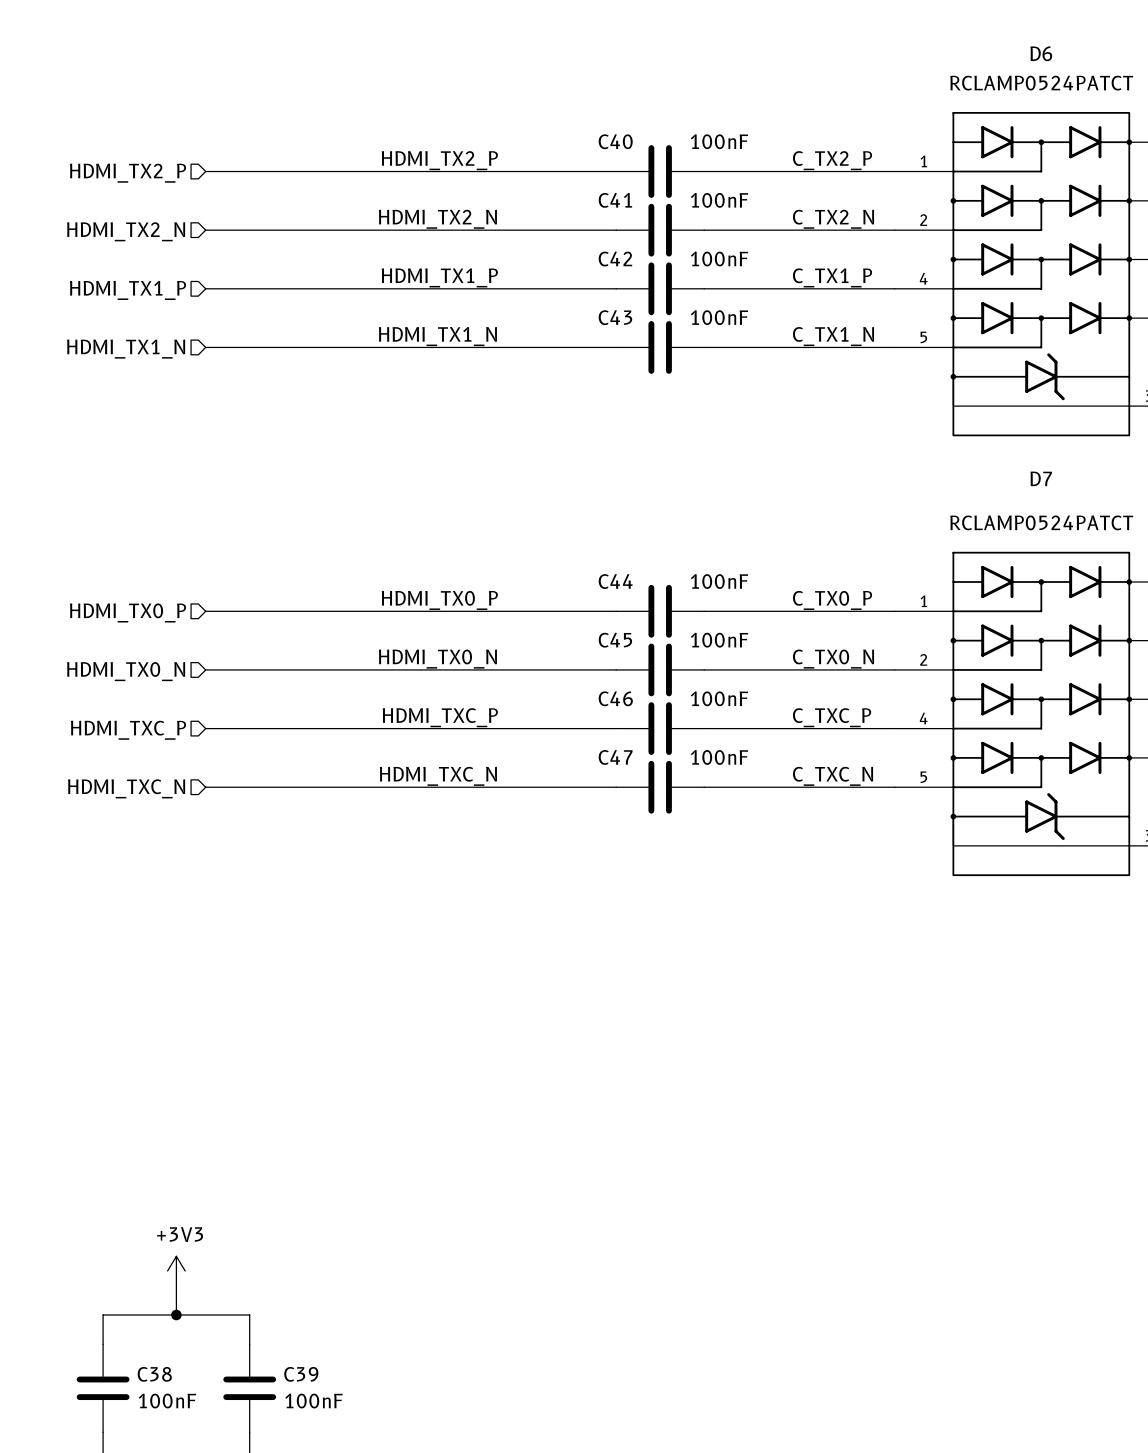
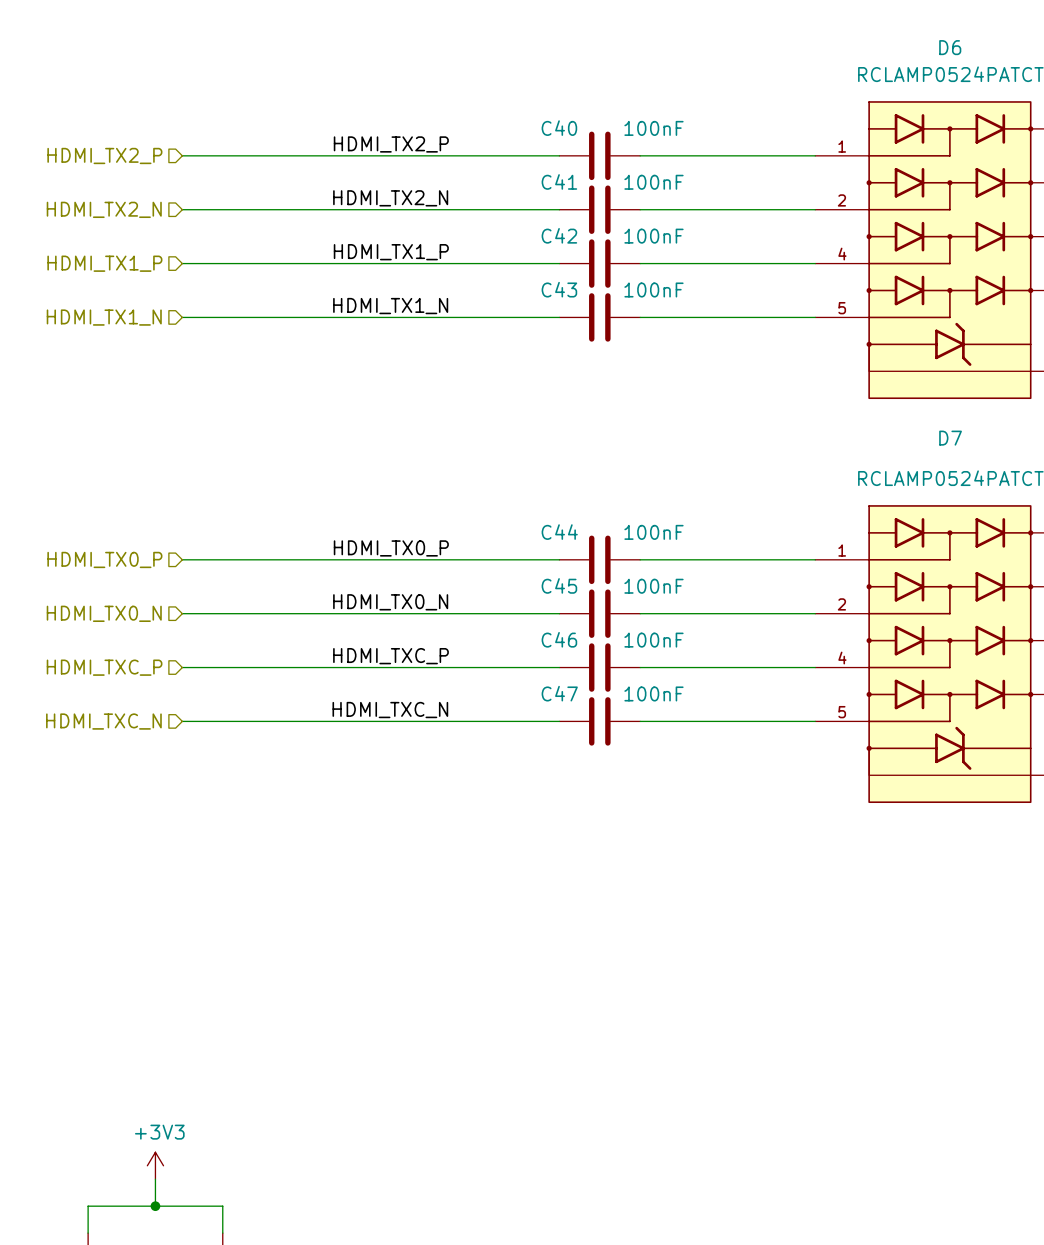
label: C_TX2_P (832, 160) -> none
label: C_TX2_N (833, 219) -> none
label: C_TX1_P (832, 277) -> none
label: C_TX1_N (833, 336) -> none
label: C_TX0_P (832, 600) -> none
label: C_TX0_N (833, 659) -> none
label: C_TXC_P (832, 717) -> none
label: C_TXC_N (833, 776) -> none

